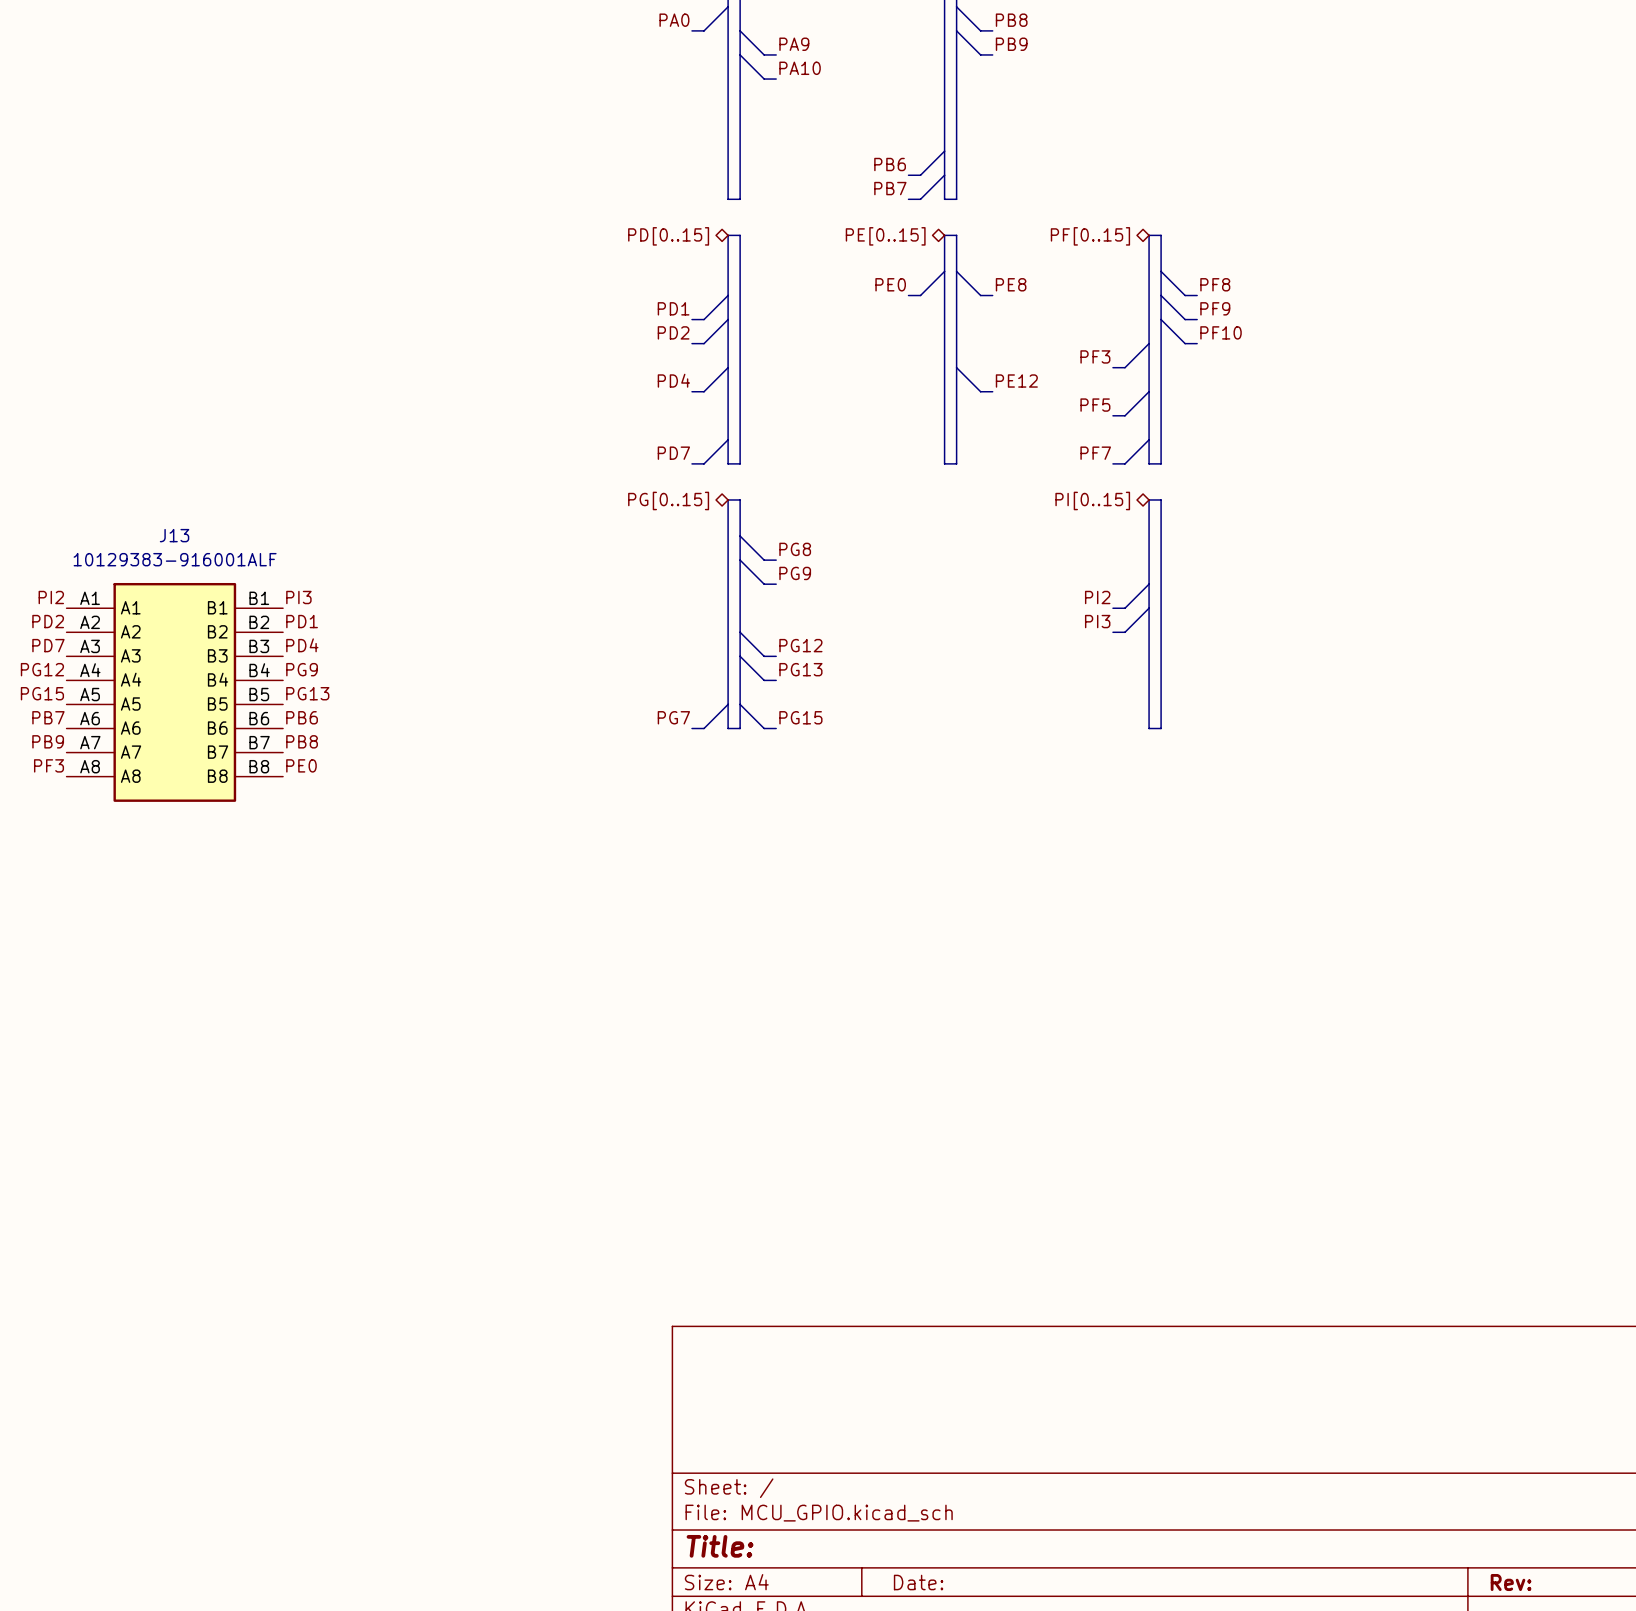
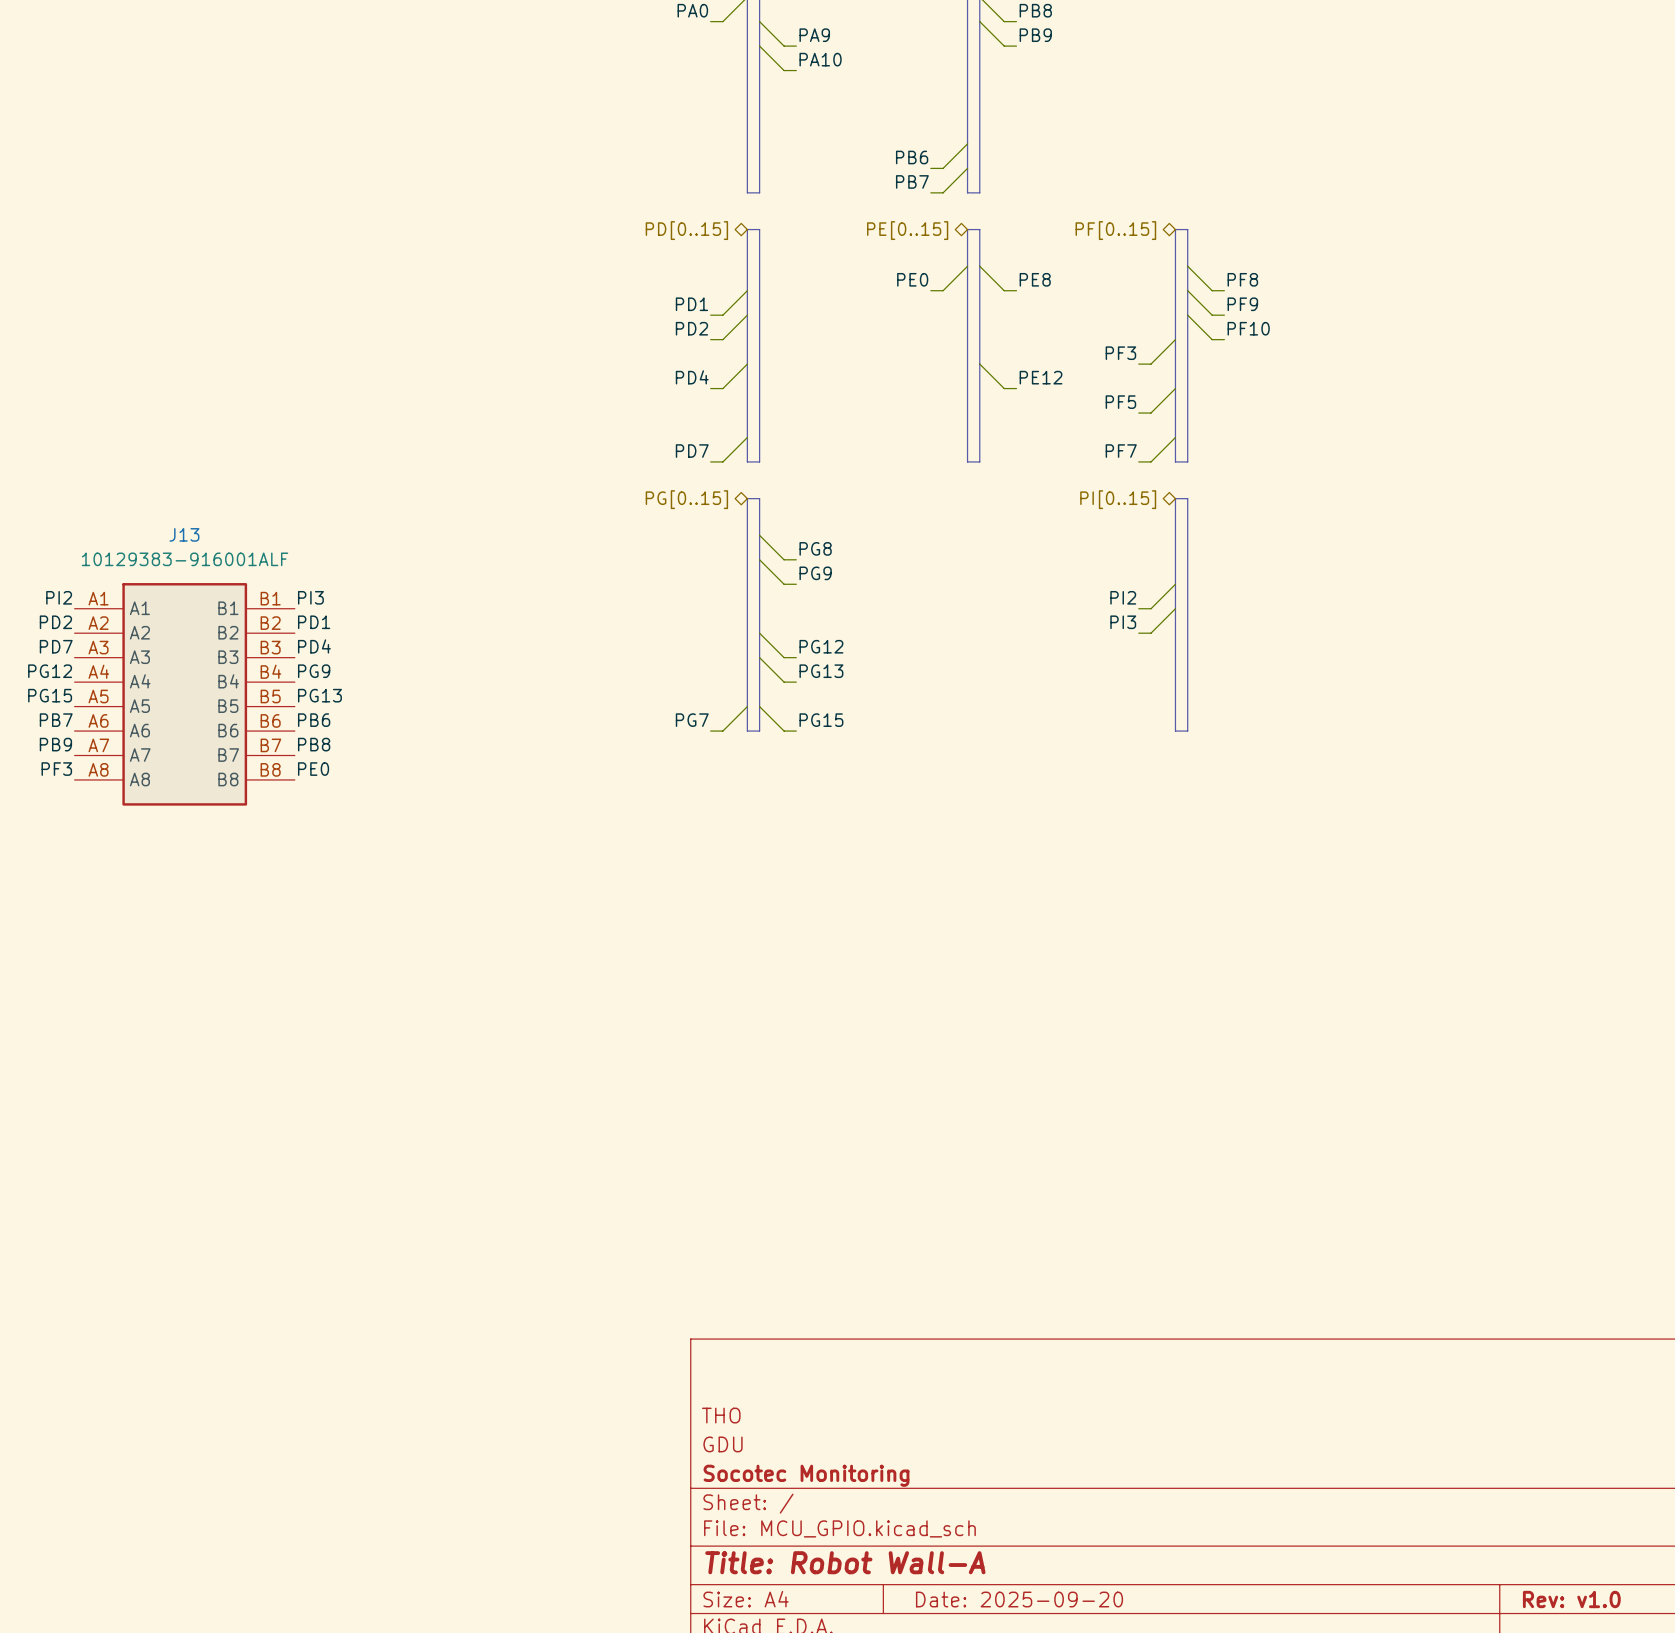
title block: none -> THO (721, 1415)
title block: none -> GDU (723, 1444)
title block: none -> Socotec Monitoring (806, 1475)
title block: Title: (720, 1546) -> Title: Robot Wall-A (845, 1562)
title block: Date: (918, 1582) -> Date: 2025-09-20 (1019, 1599)
title block: Rev: (1511, 1582) -> Rev: v1.0 (1571, 1599)

